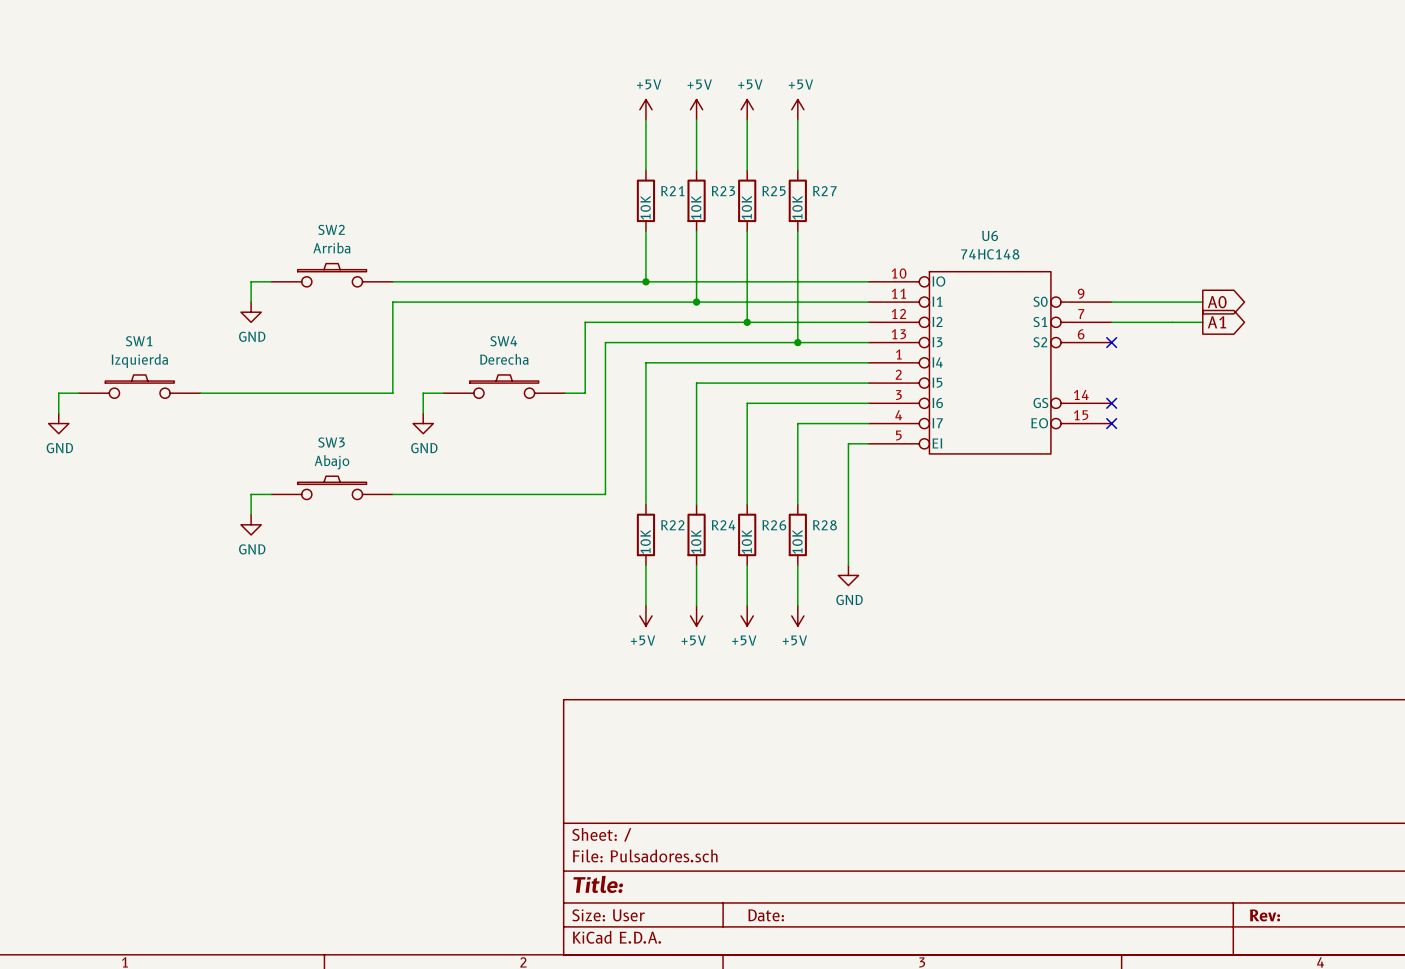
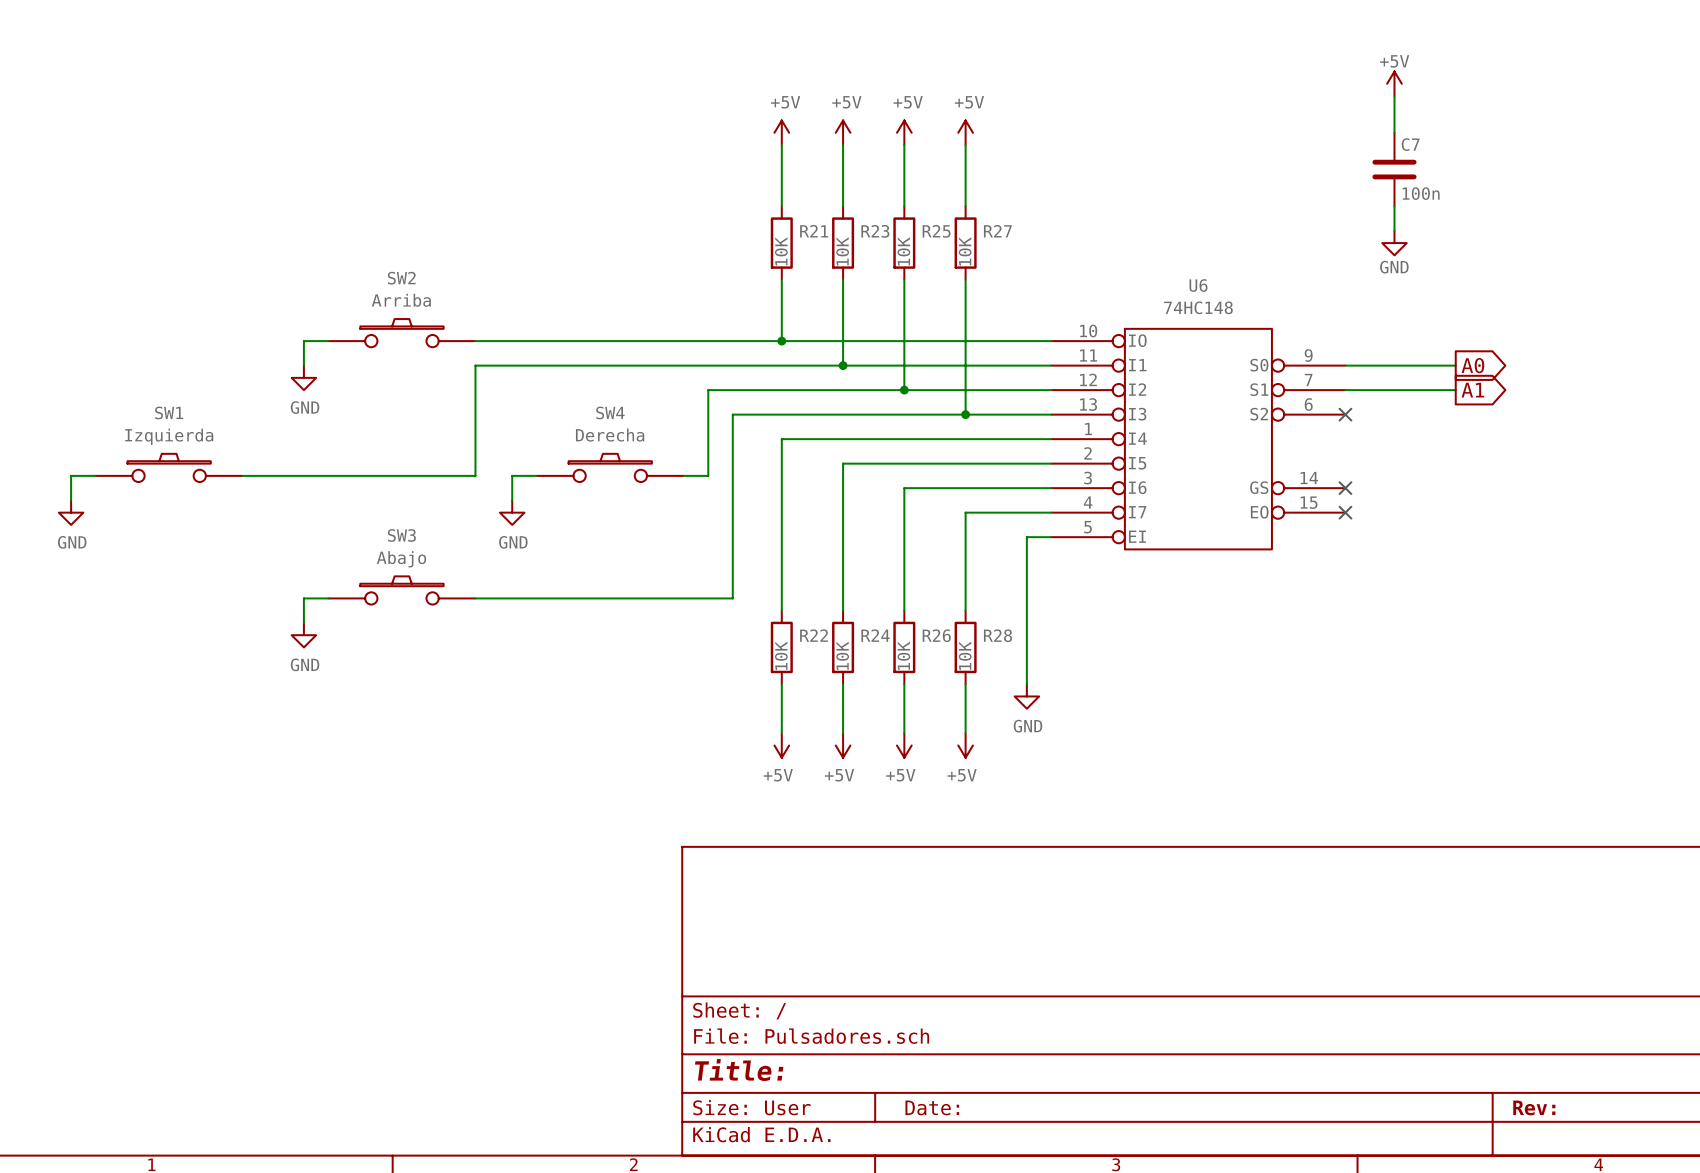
power symbol: none -> +5V (1394, 83)
wire: none -> (1394, 96) (1394, 132)
C7: none -> 100n (1394, 169)
wire: none -> (1394, 206) (1394, 230)
power symbol: none -> GND (1394, 243)

